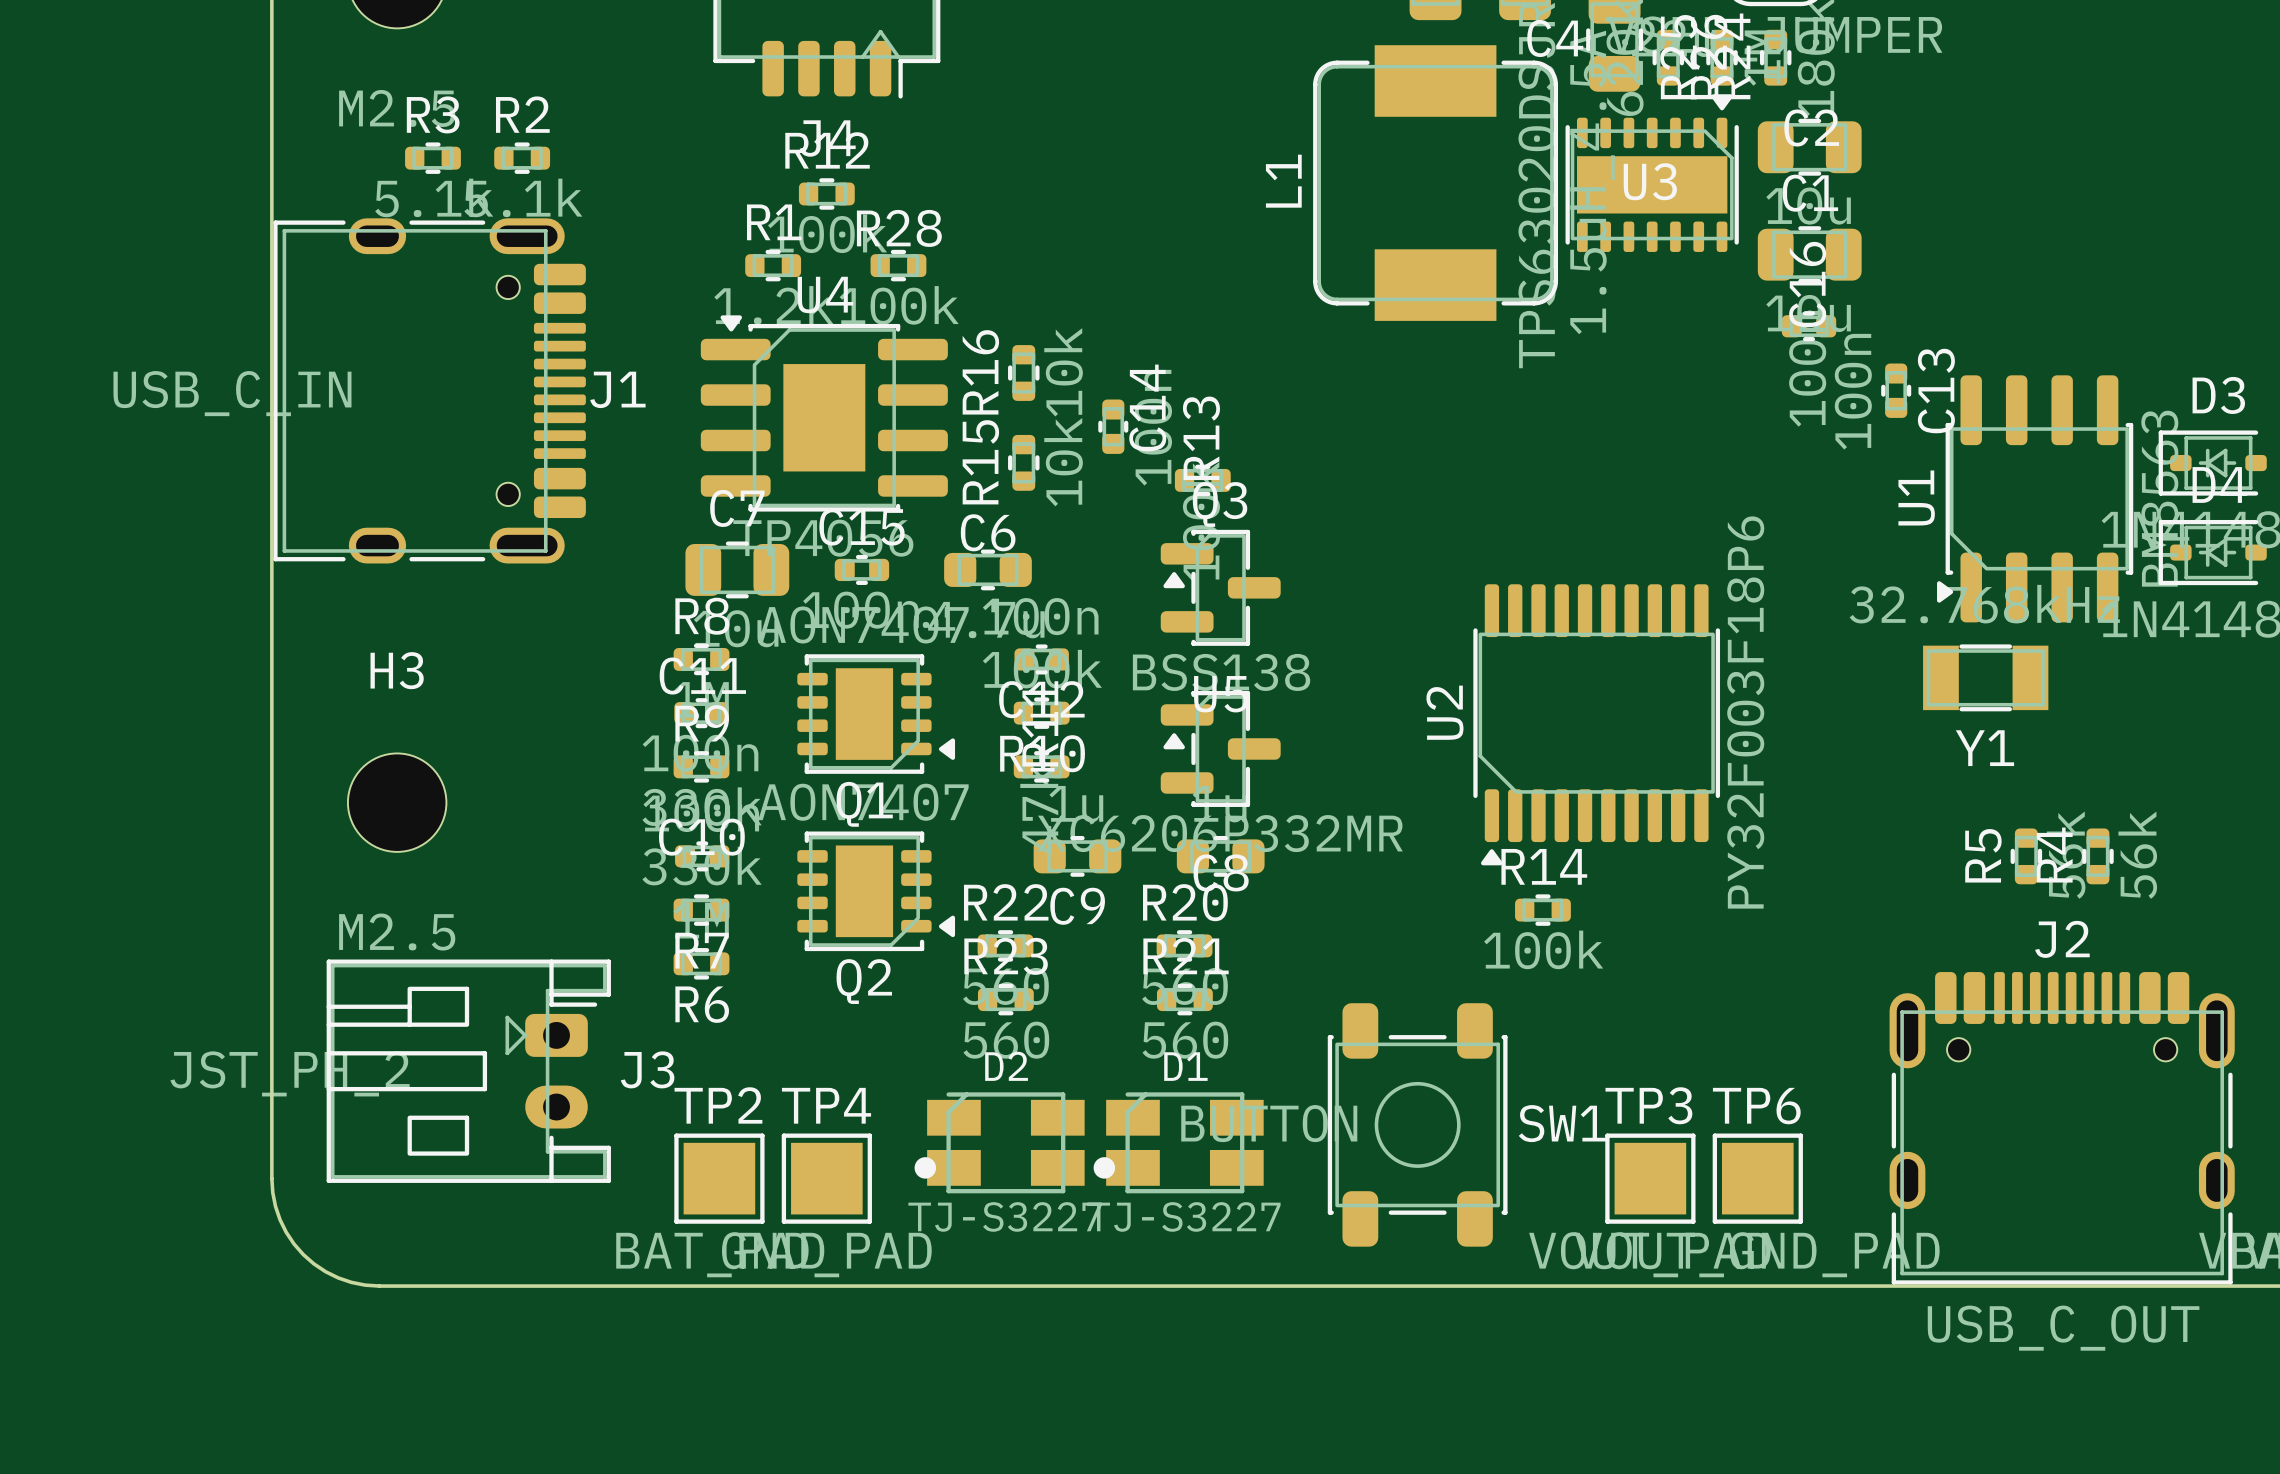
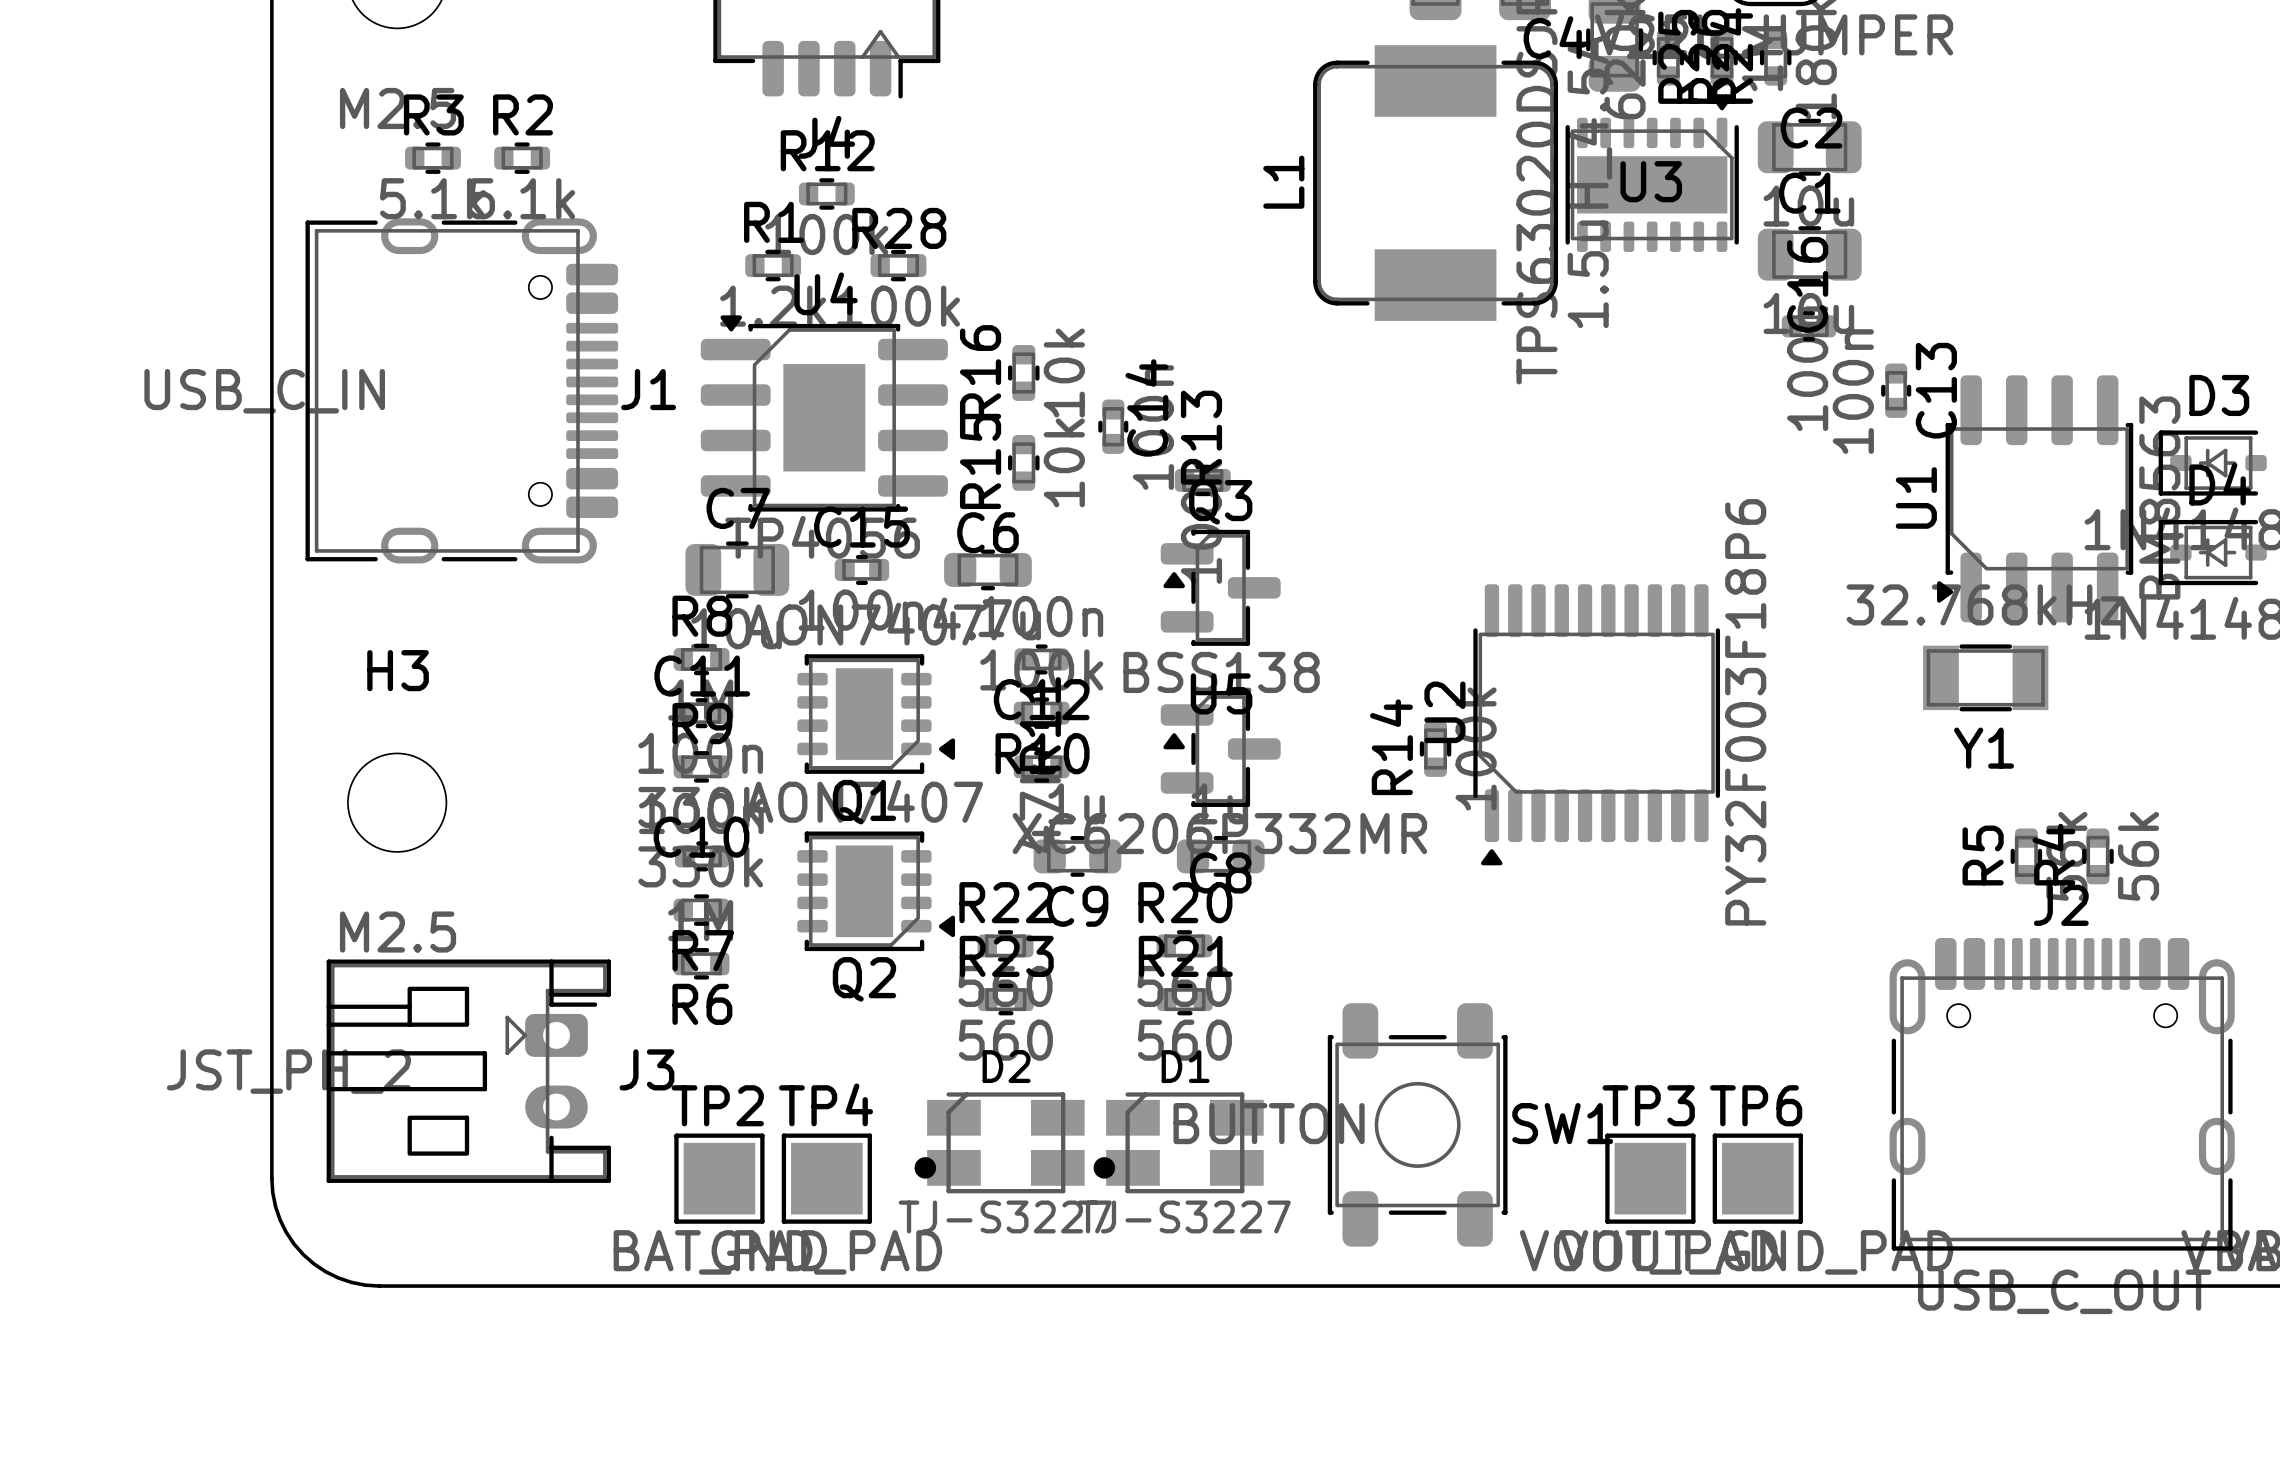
J1 position: (429, 390) -> (461, 390)
R14 rotation: 0° (1542, 910) -> 90° clockwise (1435, 748)
R14 position: (1542, 910) -> (1435, 748)
J2 position: (2062, 1128) -> (2062, 1094)

